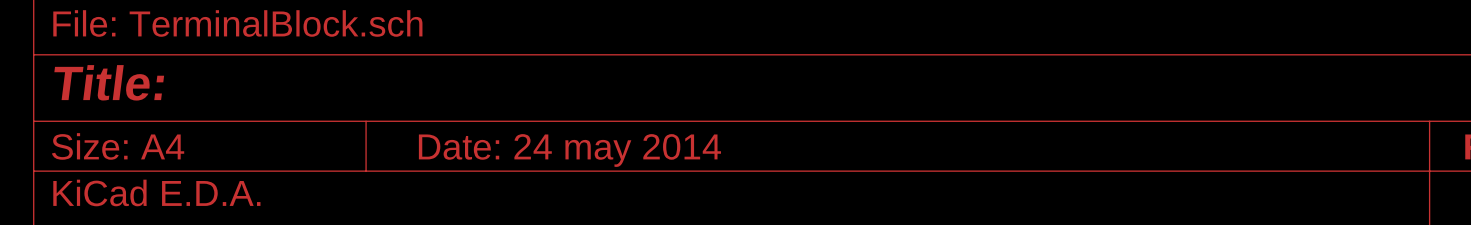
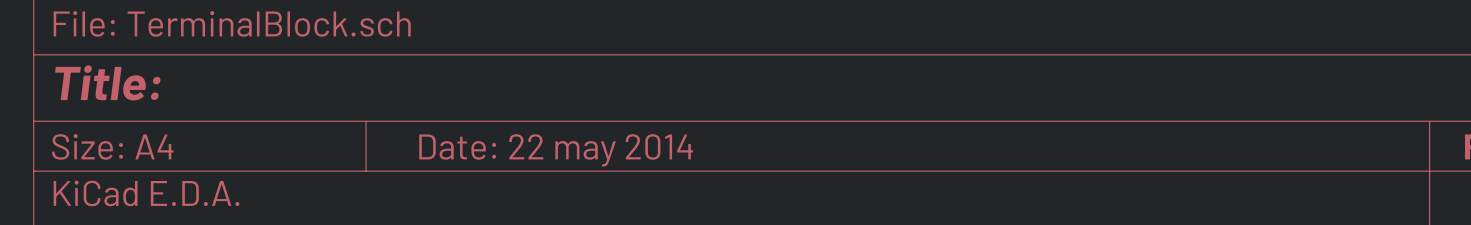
title block: Date: 24 may 2014 (569, 150) -> Date: 22 may 2014 (556, 150)

